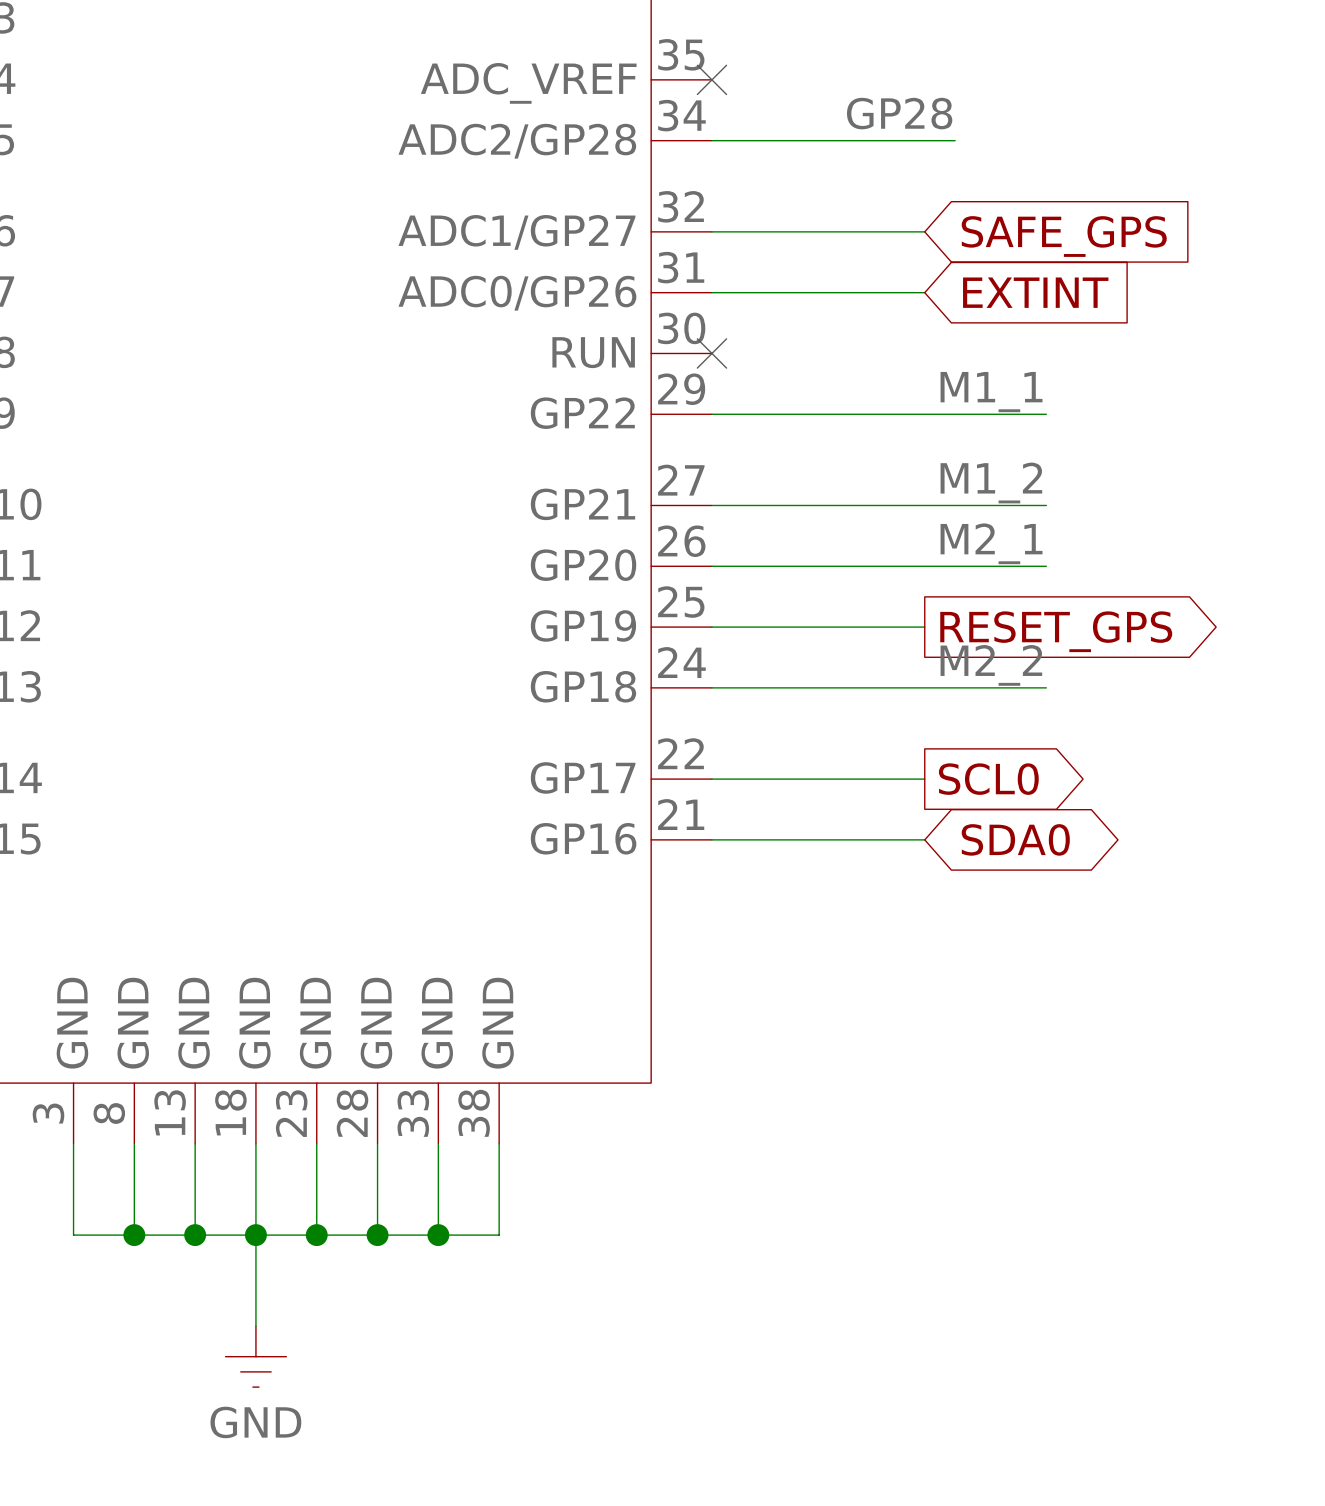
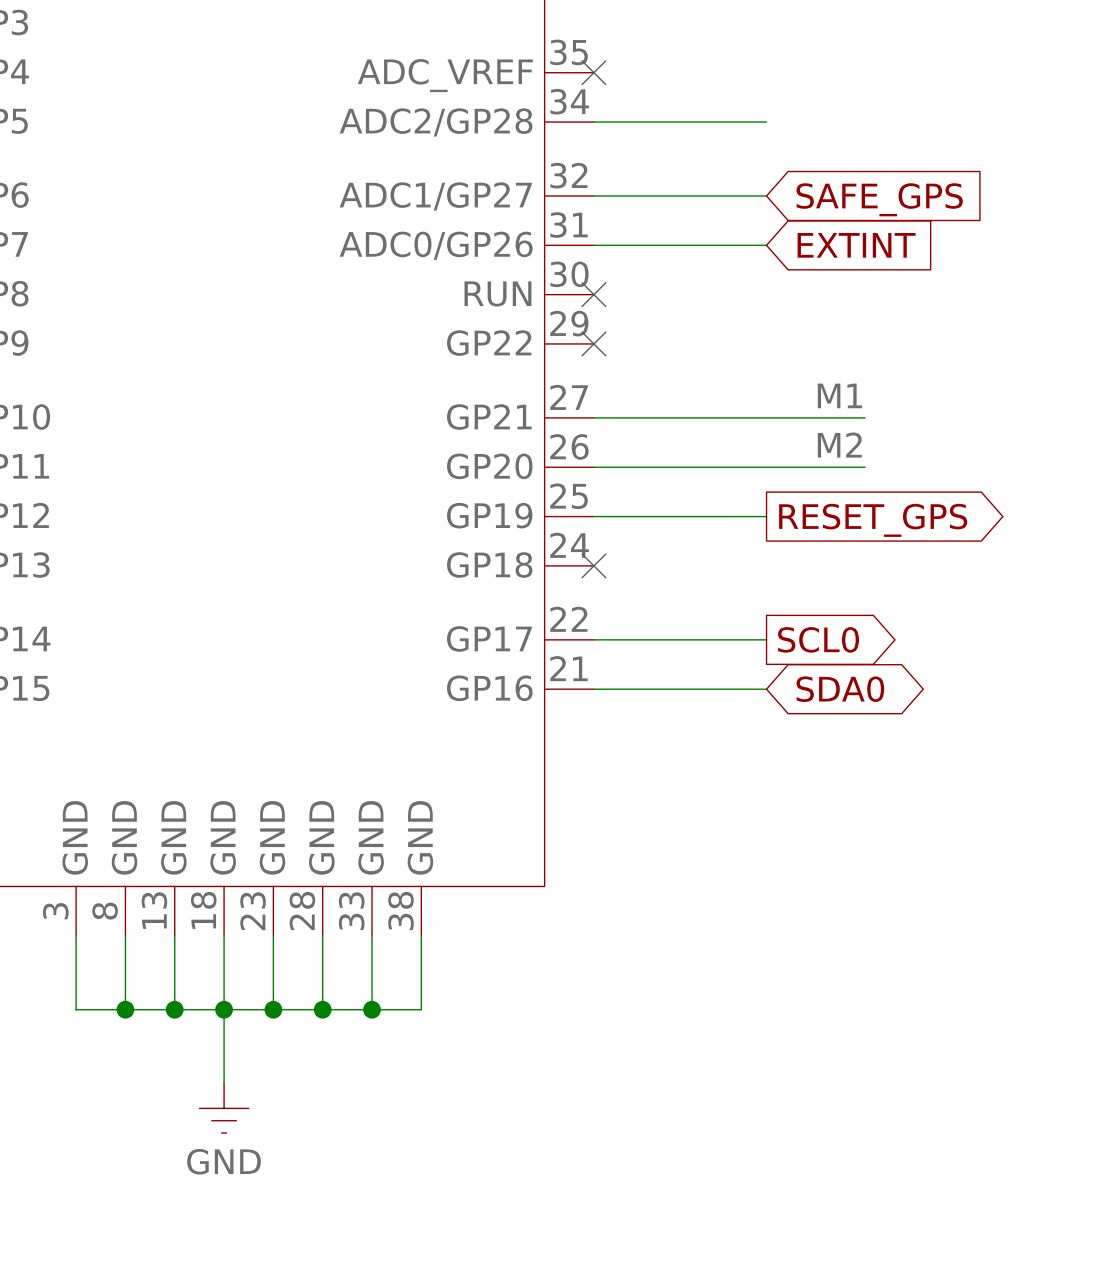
label: GP28 (899, 113) -> none
wire: (924, 140) (955, 140) -> none
label: M1_1 (991, 392) -> none
wire: (711, 414) (1046, 414) -> none
no-connect mark: none -> (593, 343)
label: M1_2 (991, 482) -> M1 (839, 395)
label: M2_1 (991, 543) -> M2 (839, 445)
label: M2_2 (991, 665) -> none
wire: (711, 687) (1046, 687) -> none
no-connect mark: none -> (593, 565)

